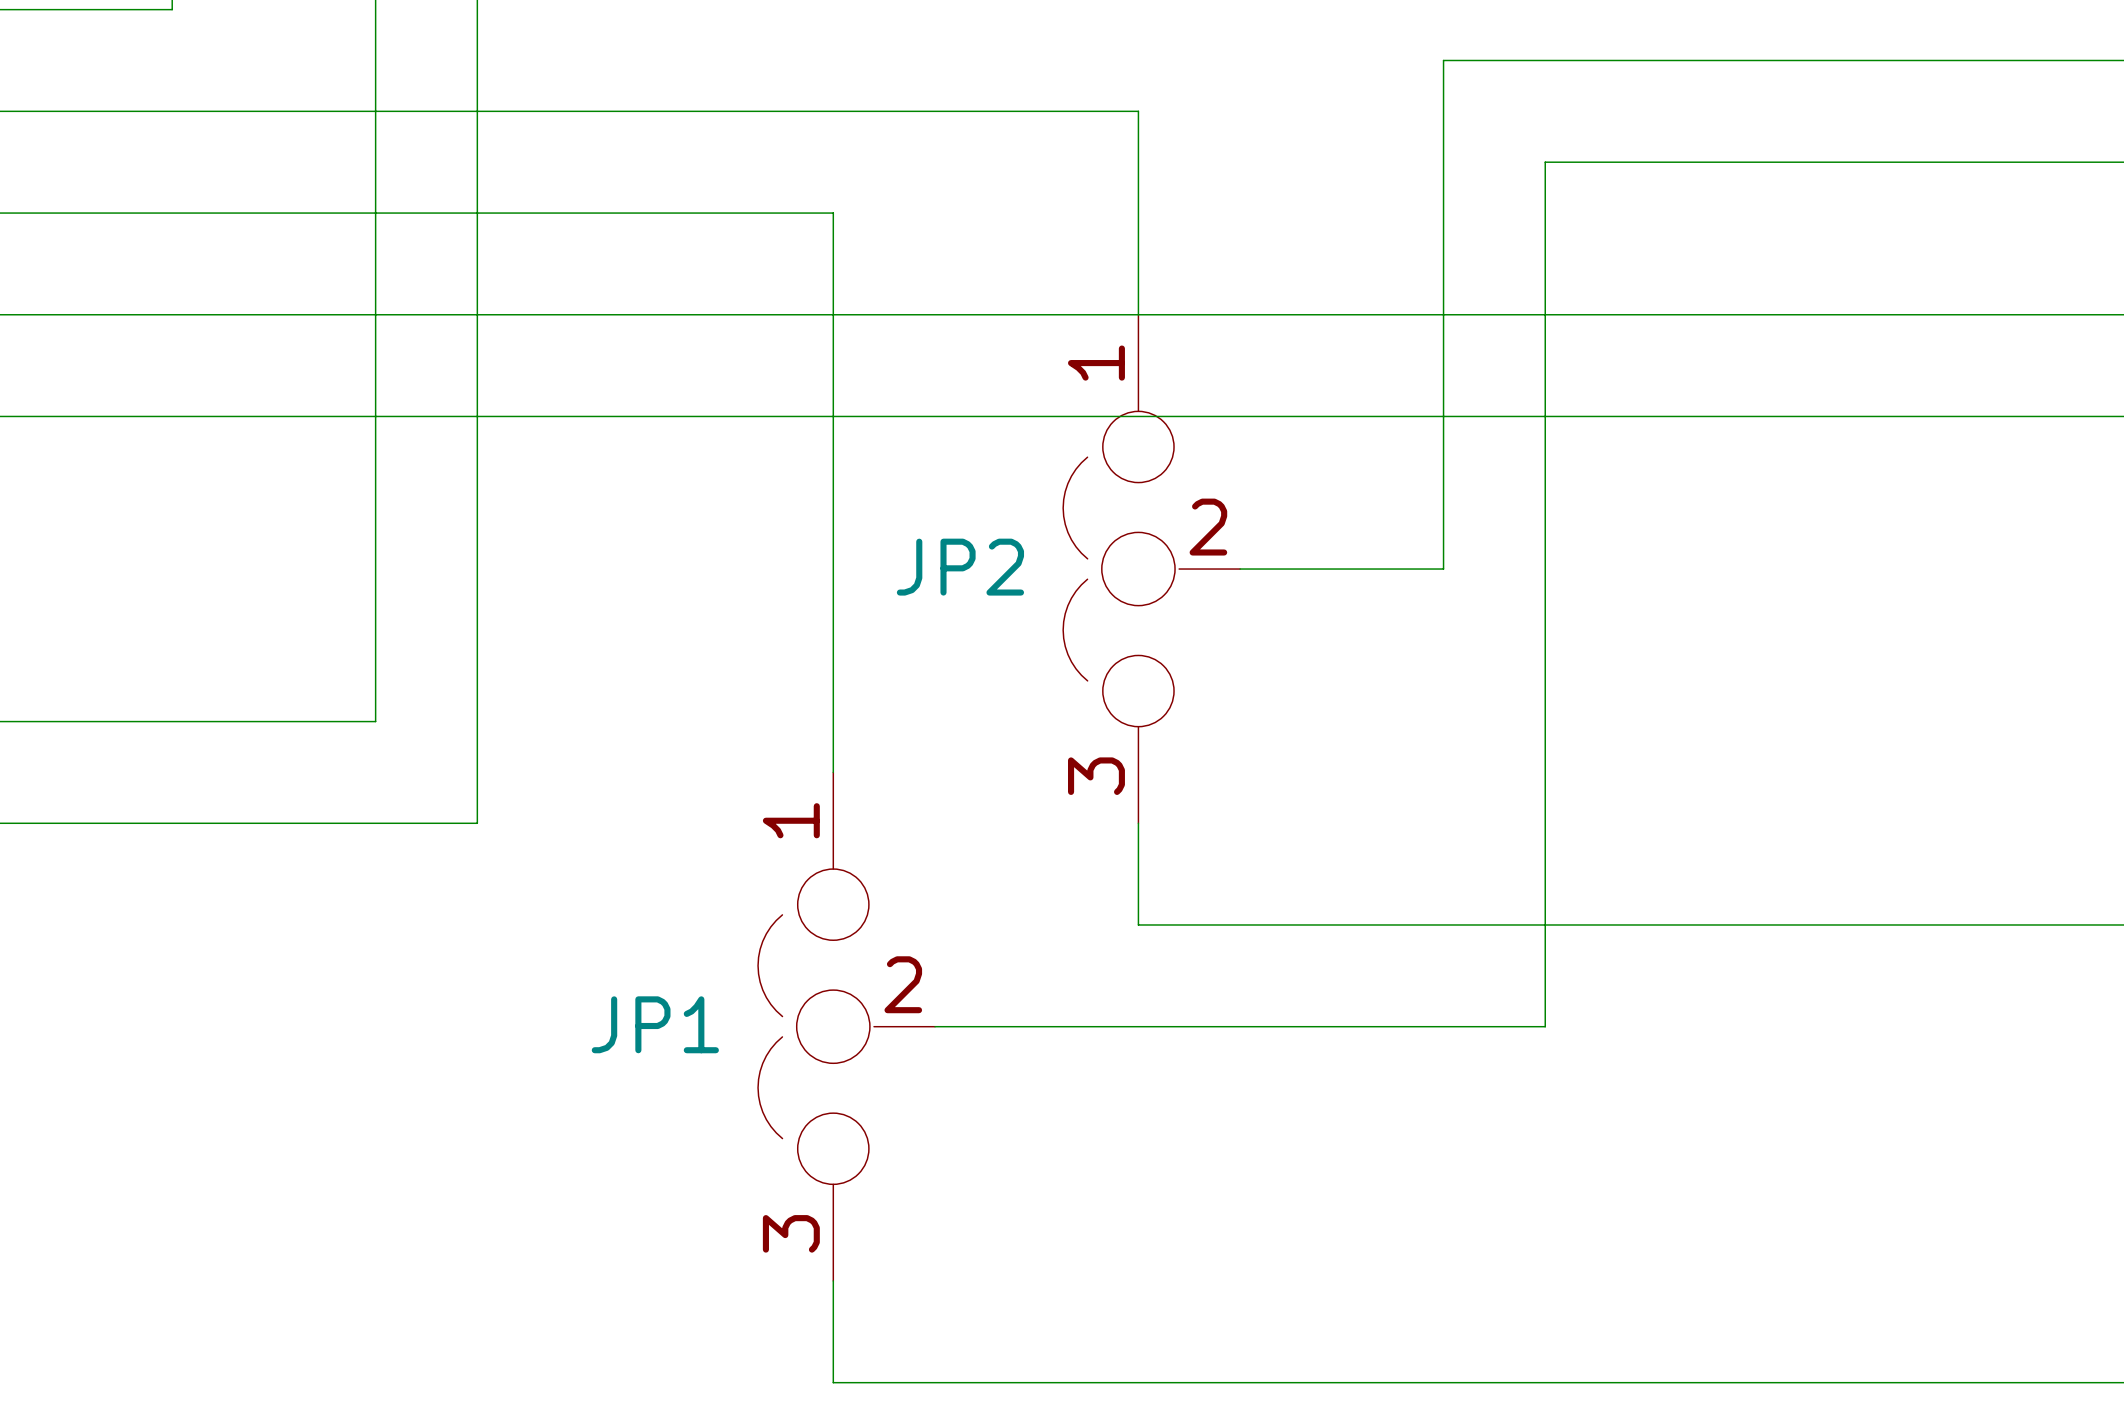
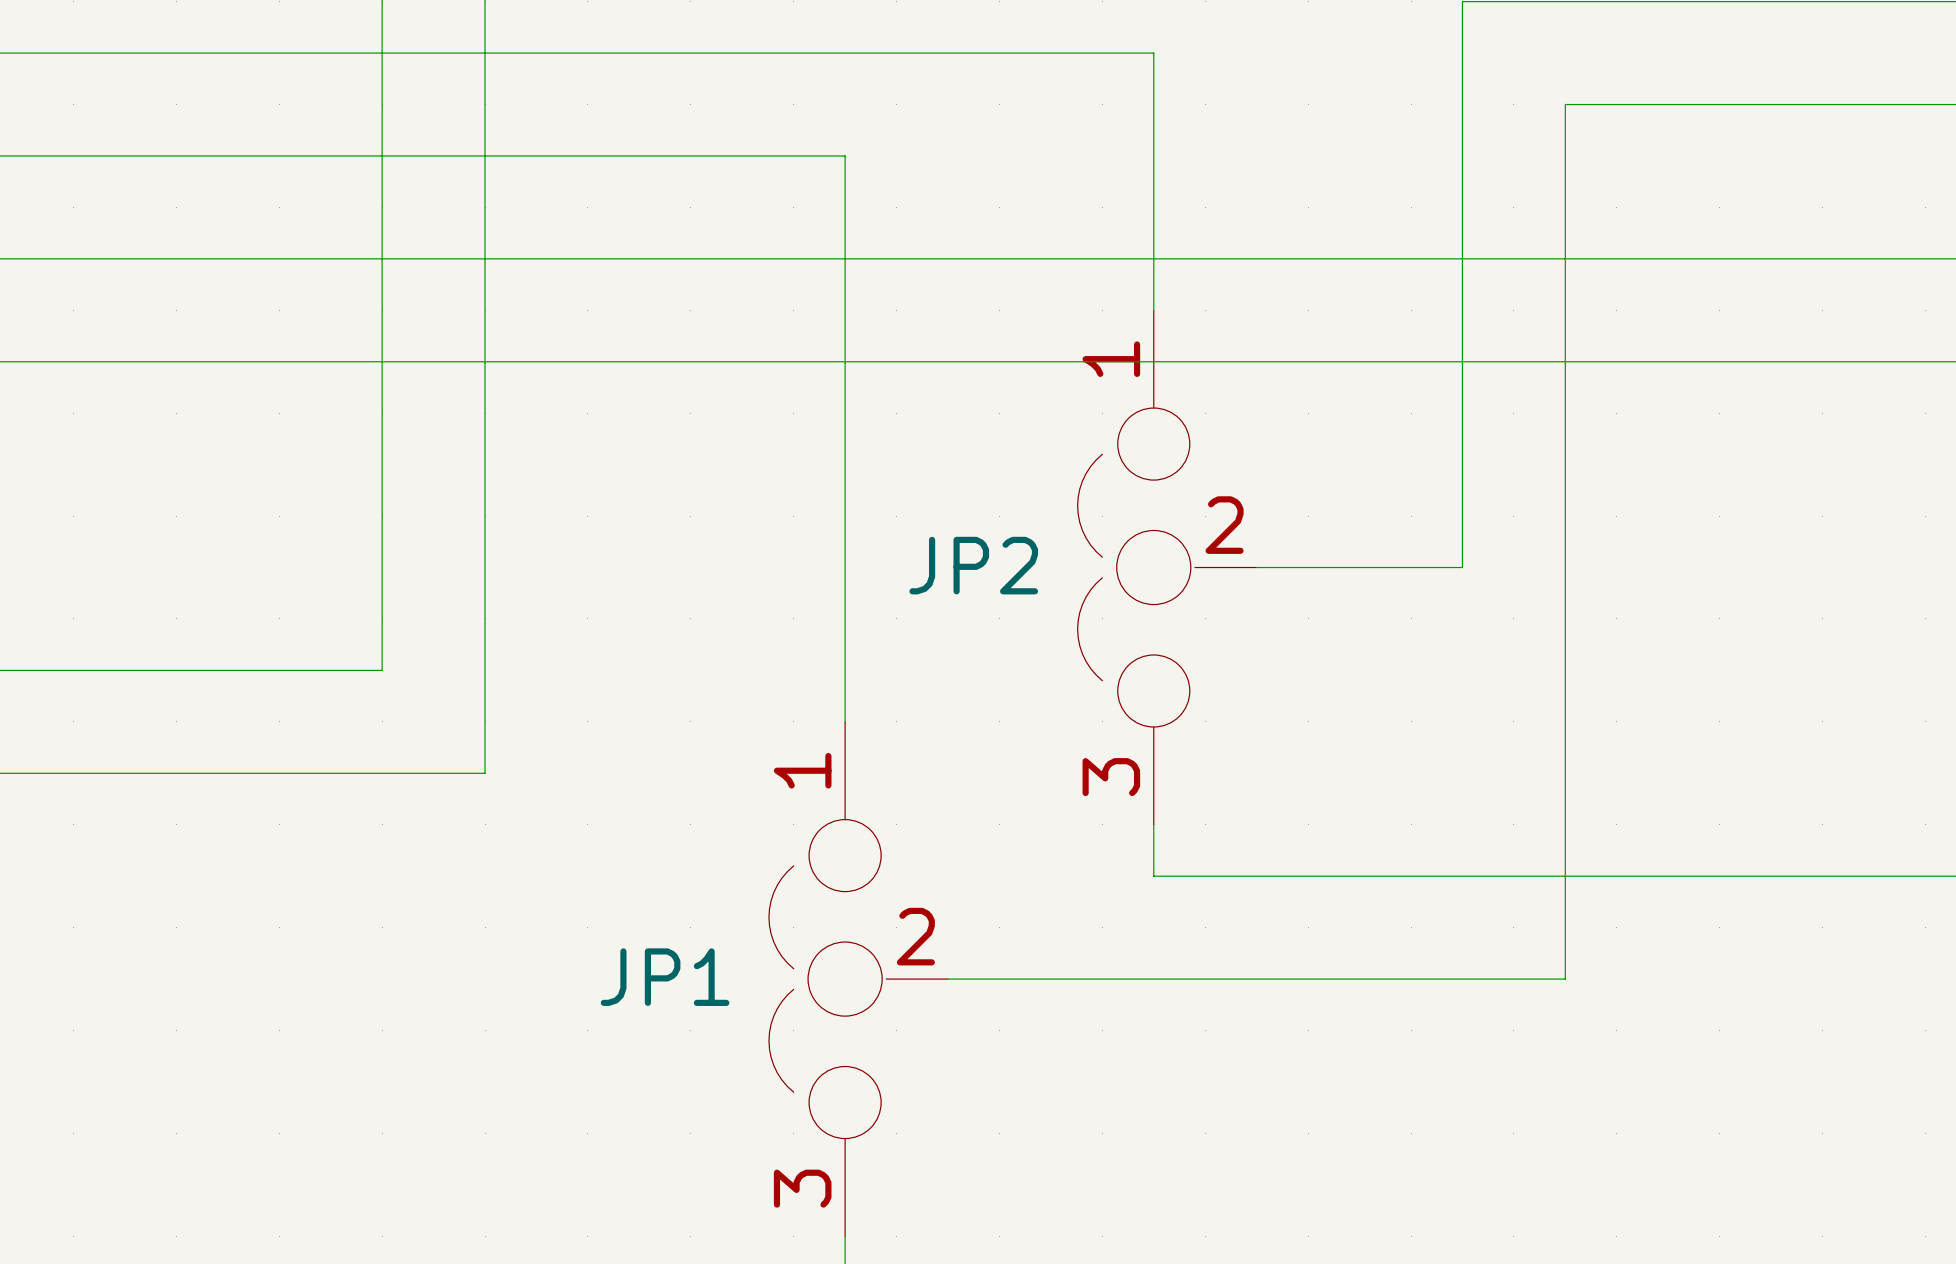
JP2 position: (1151, 569) -> (1167, 567)
wire: (1240, 569) (1443, 569) -> (1256, 567) (1462, 567) (1462, 516)

